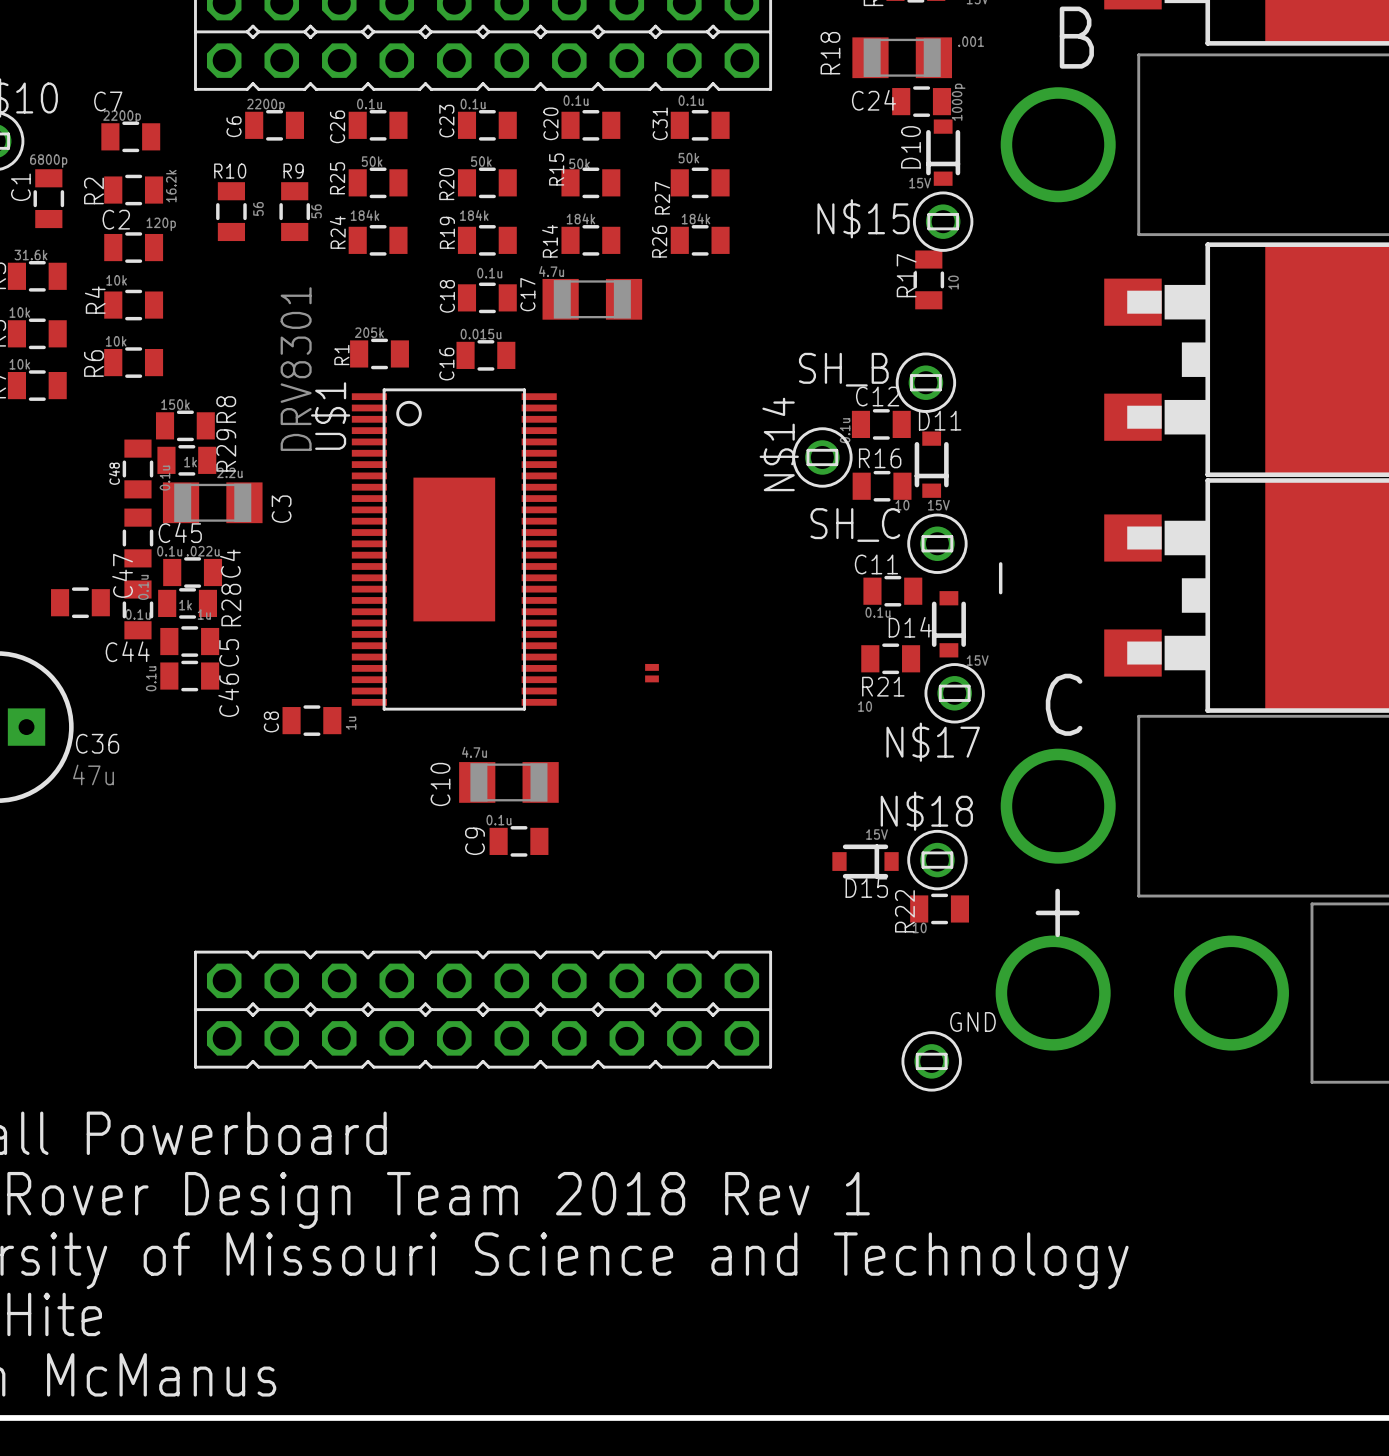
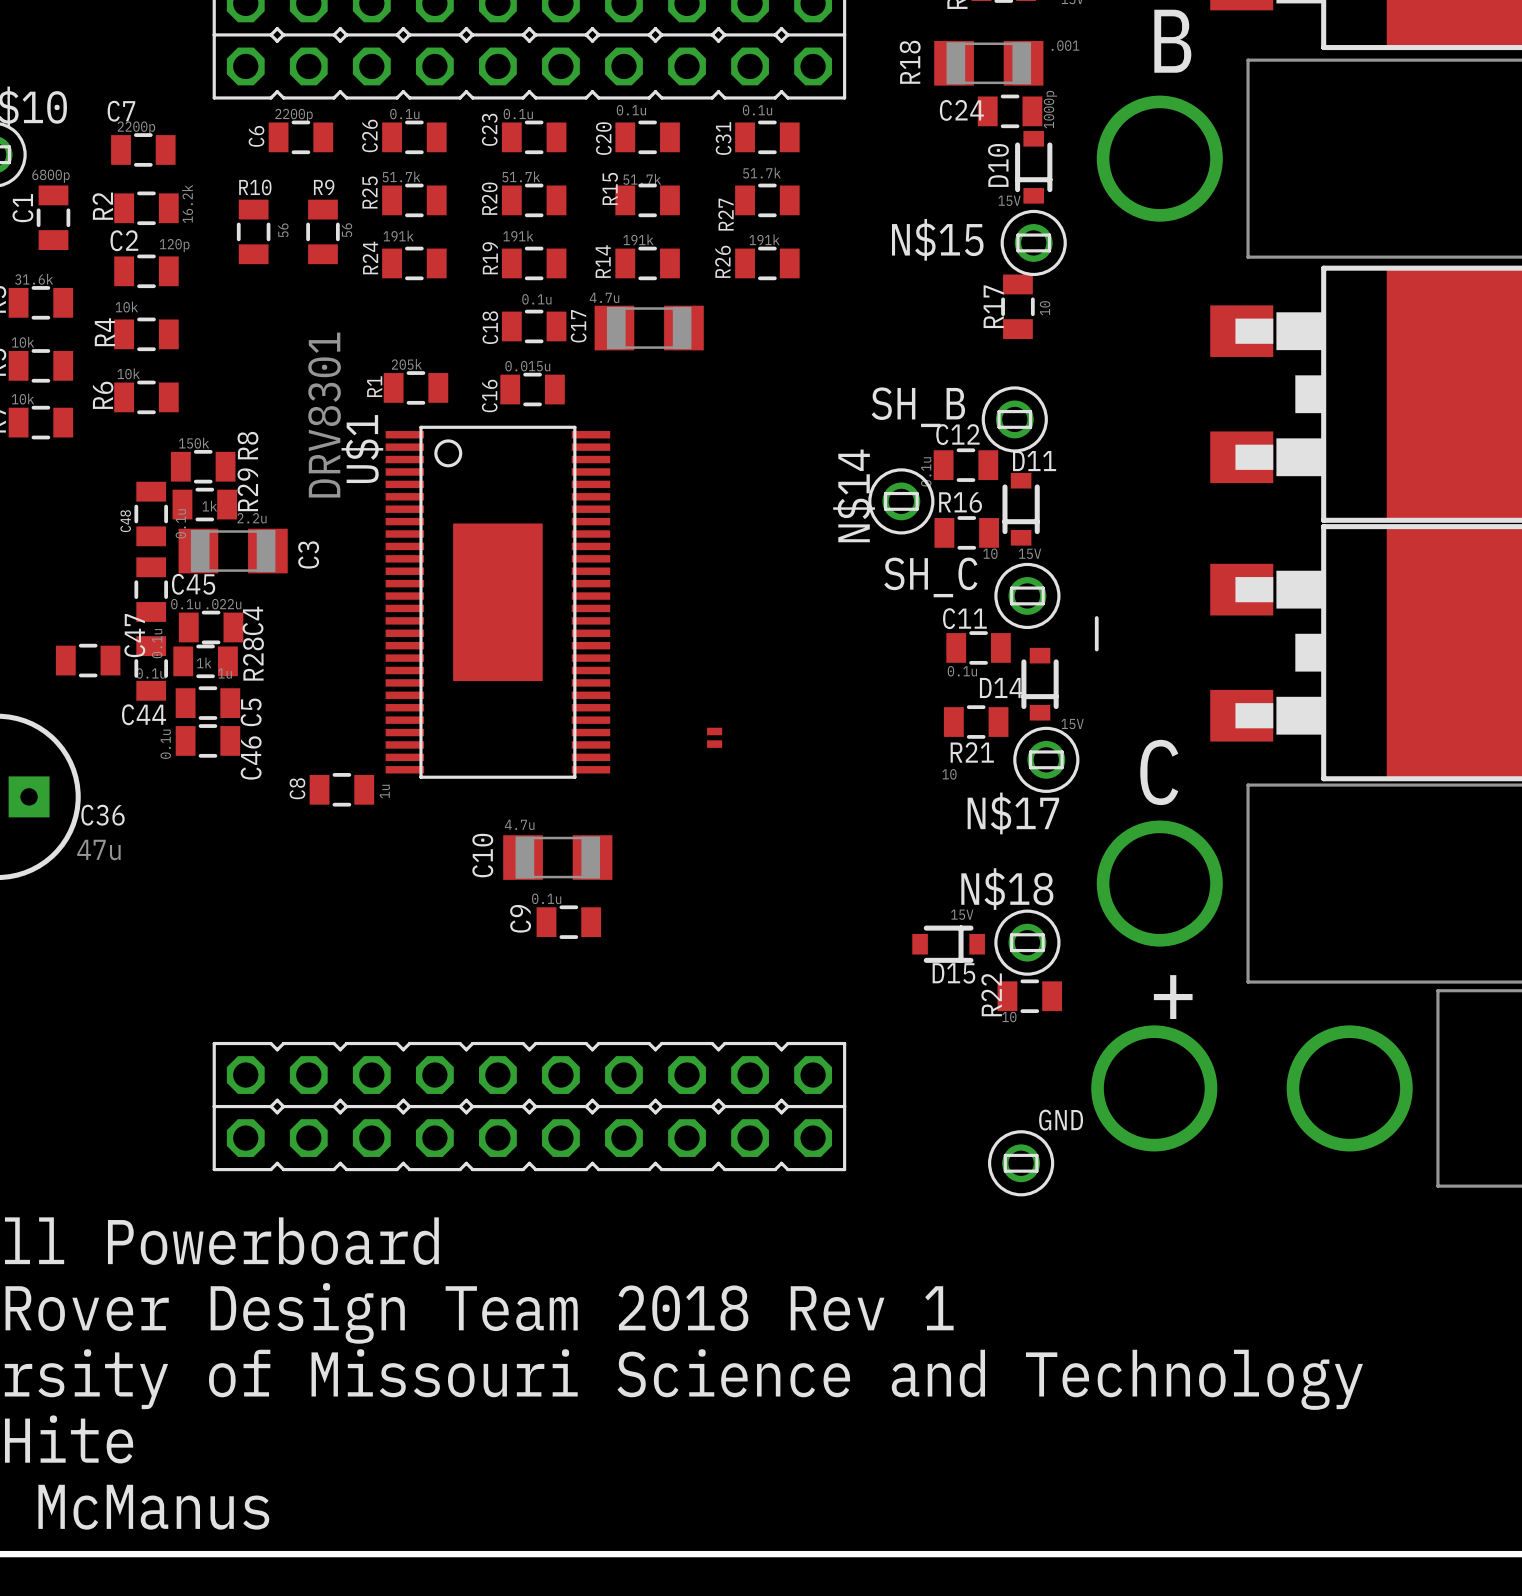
R27 value: 50k (688, 158) -> 51.7k (761, 173)
R25 value: 50k (372, 161) -> 51.7k (401, 176)
R20 value: 50k (481, 161) -> 51.7k (521, 176)
R15 value: 50k (579, 163) -> 51.7k (642, 179)
R24 value: 184k (365, 215) -> 191k (398, 236)
R19 value: 184k (474, 215) -> 191k (518, 236)
R14 value: 184k (580, 218) -> 191k (638, 239)
R26 value: 184k (696, 218) -> 191k (764, 239)

